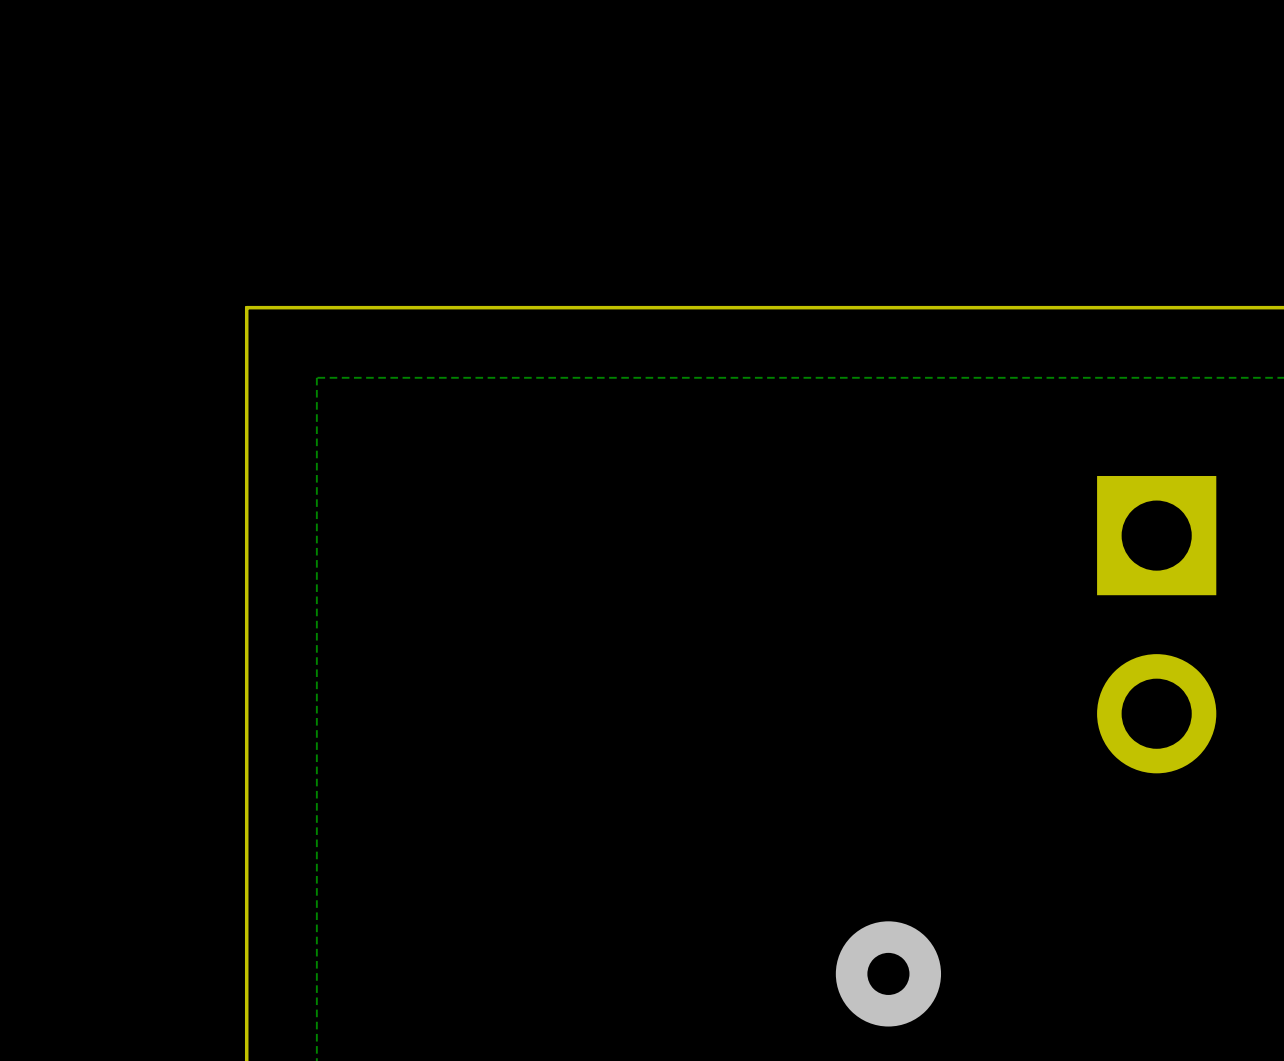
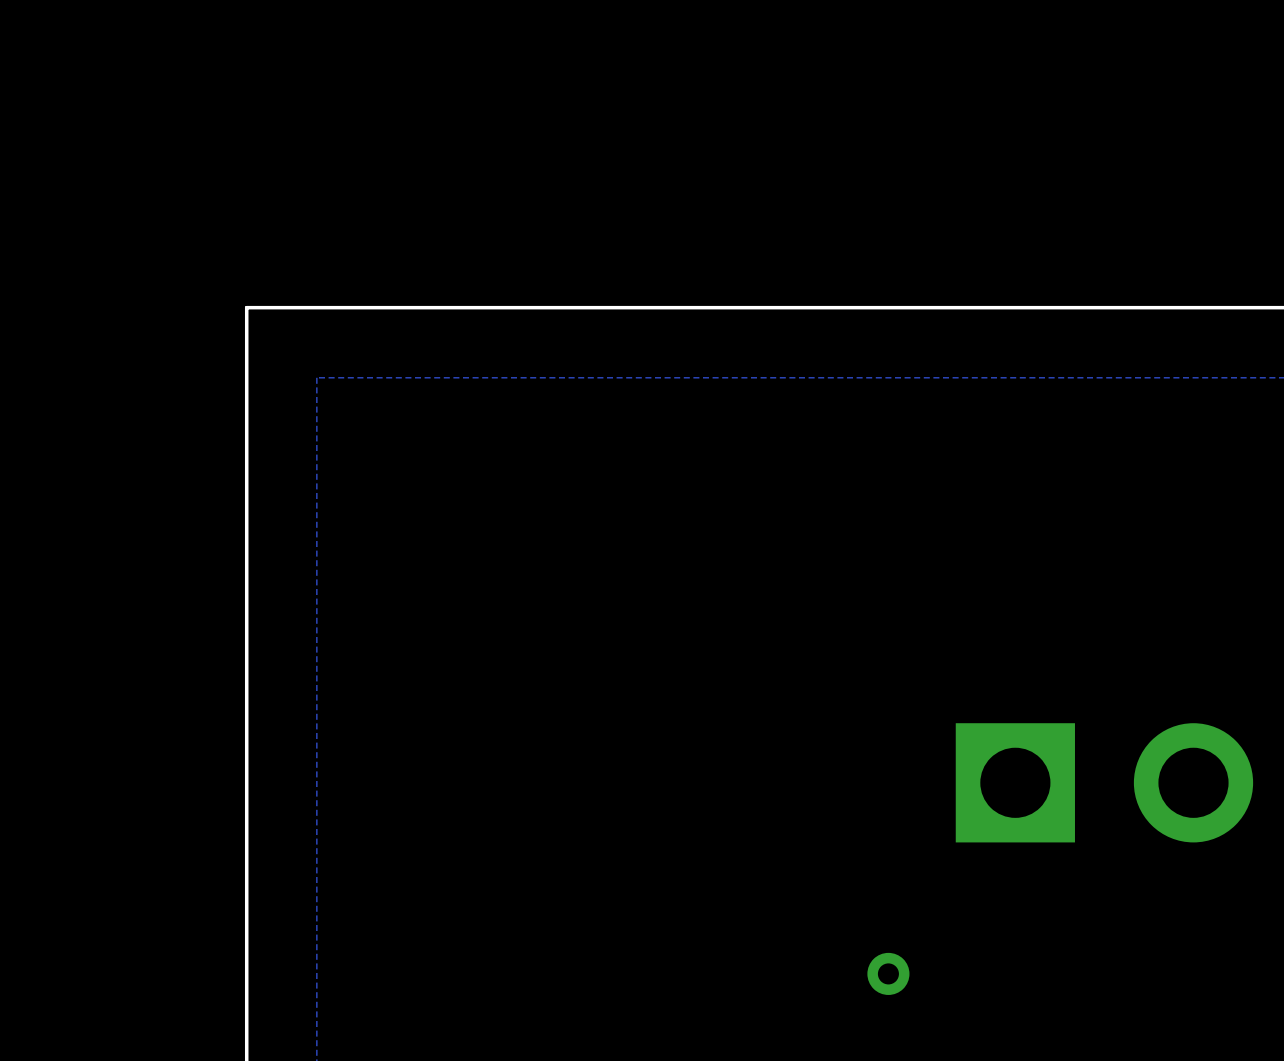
part rotation: 0° (1156, 624) -> 90° counterclockwise (1104, 782)
via size: [835, 921, 942, 1027] -> [867, 952, 910, 995]

